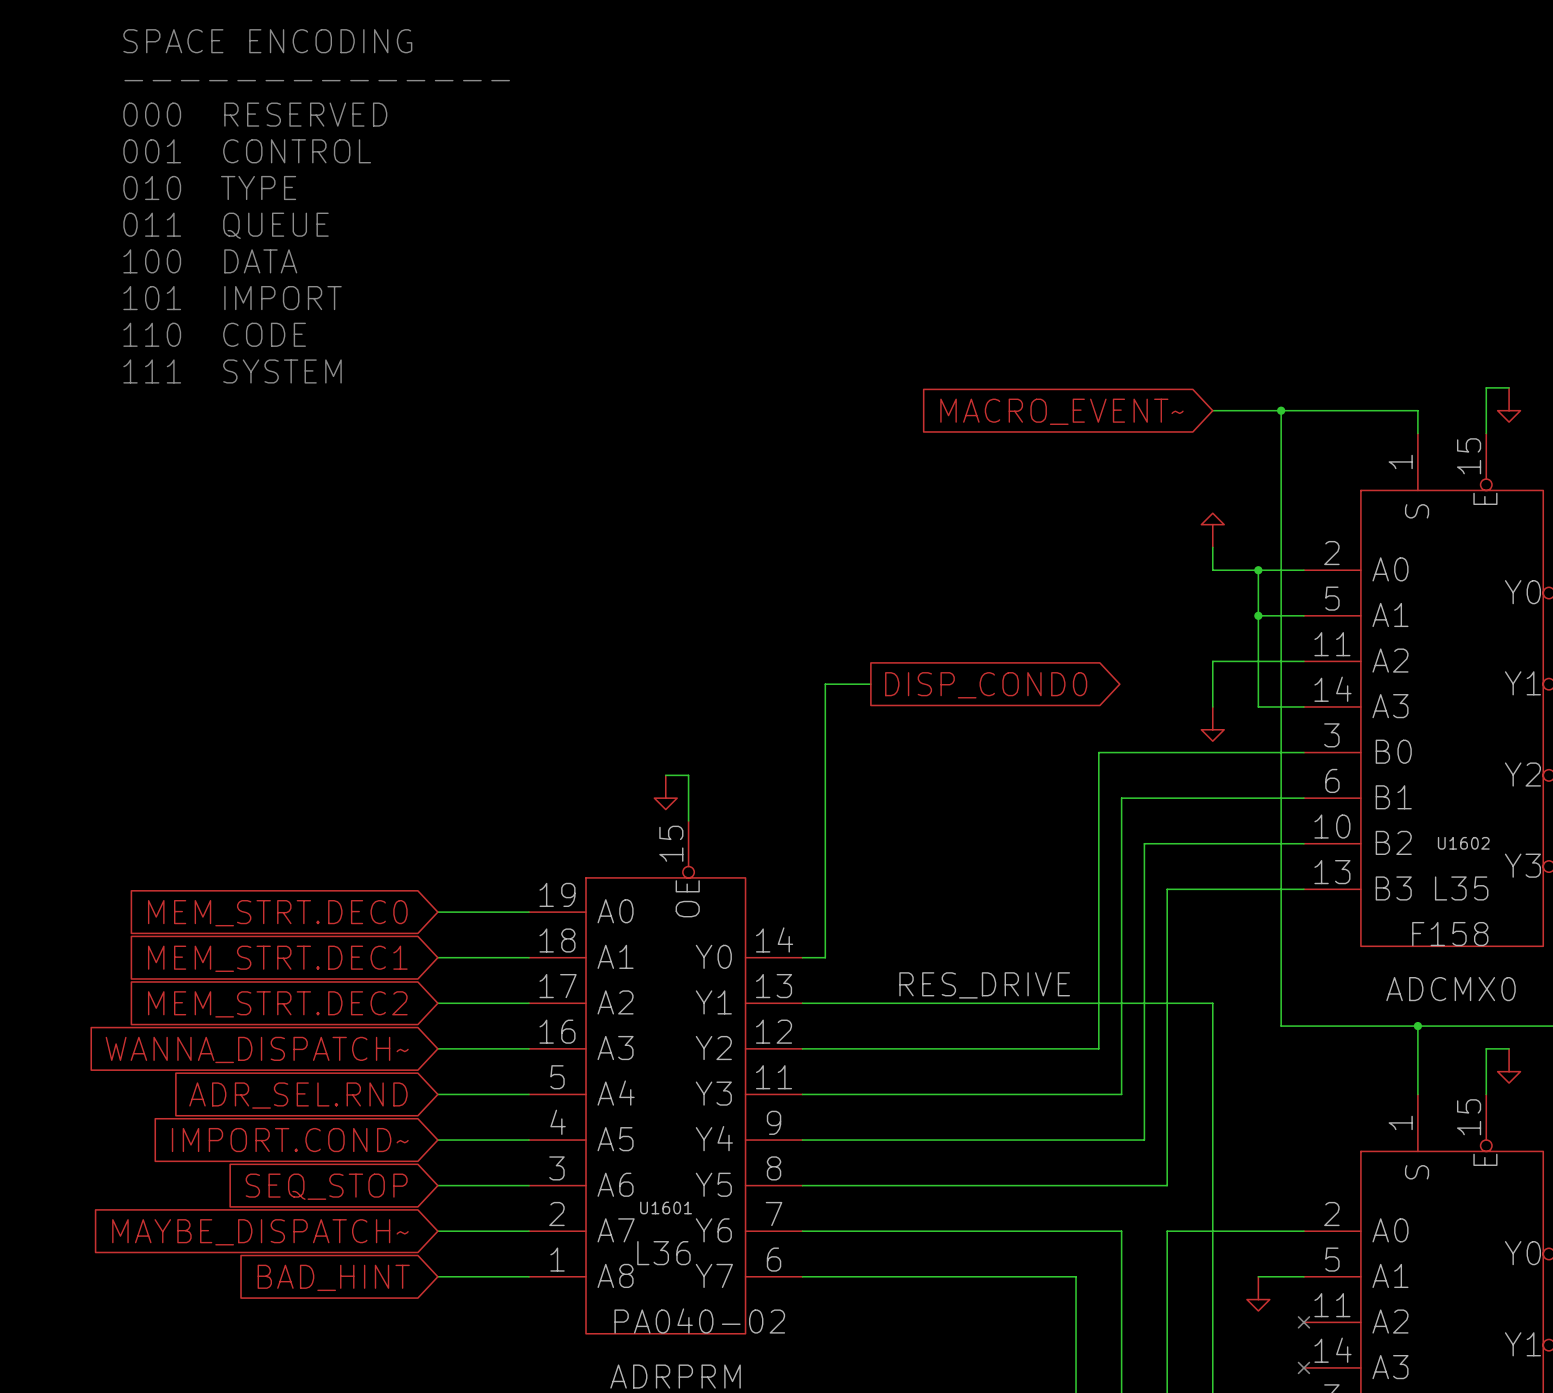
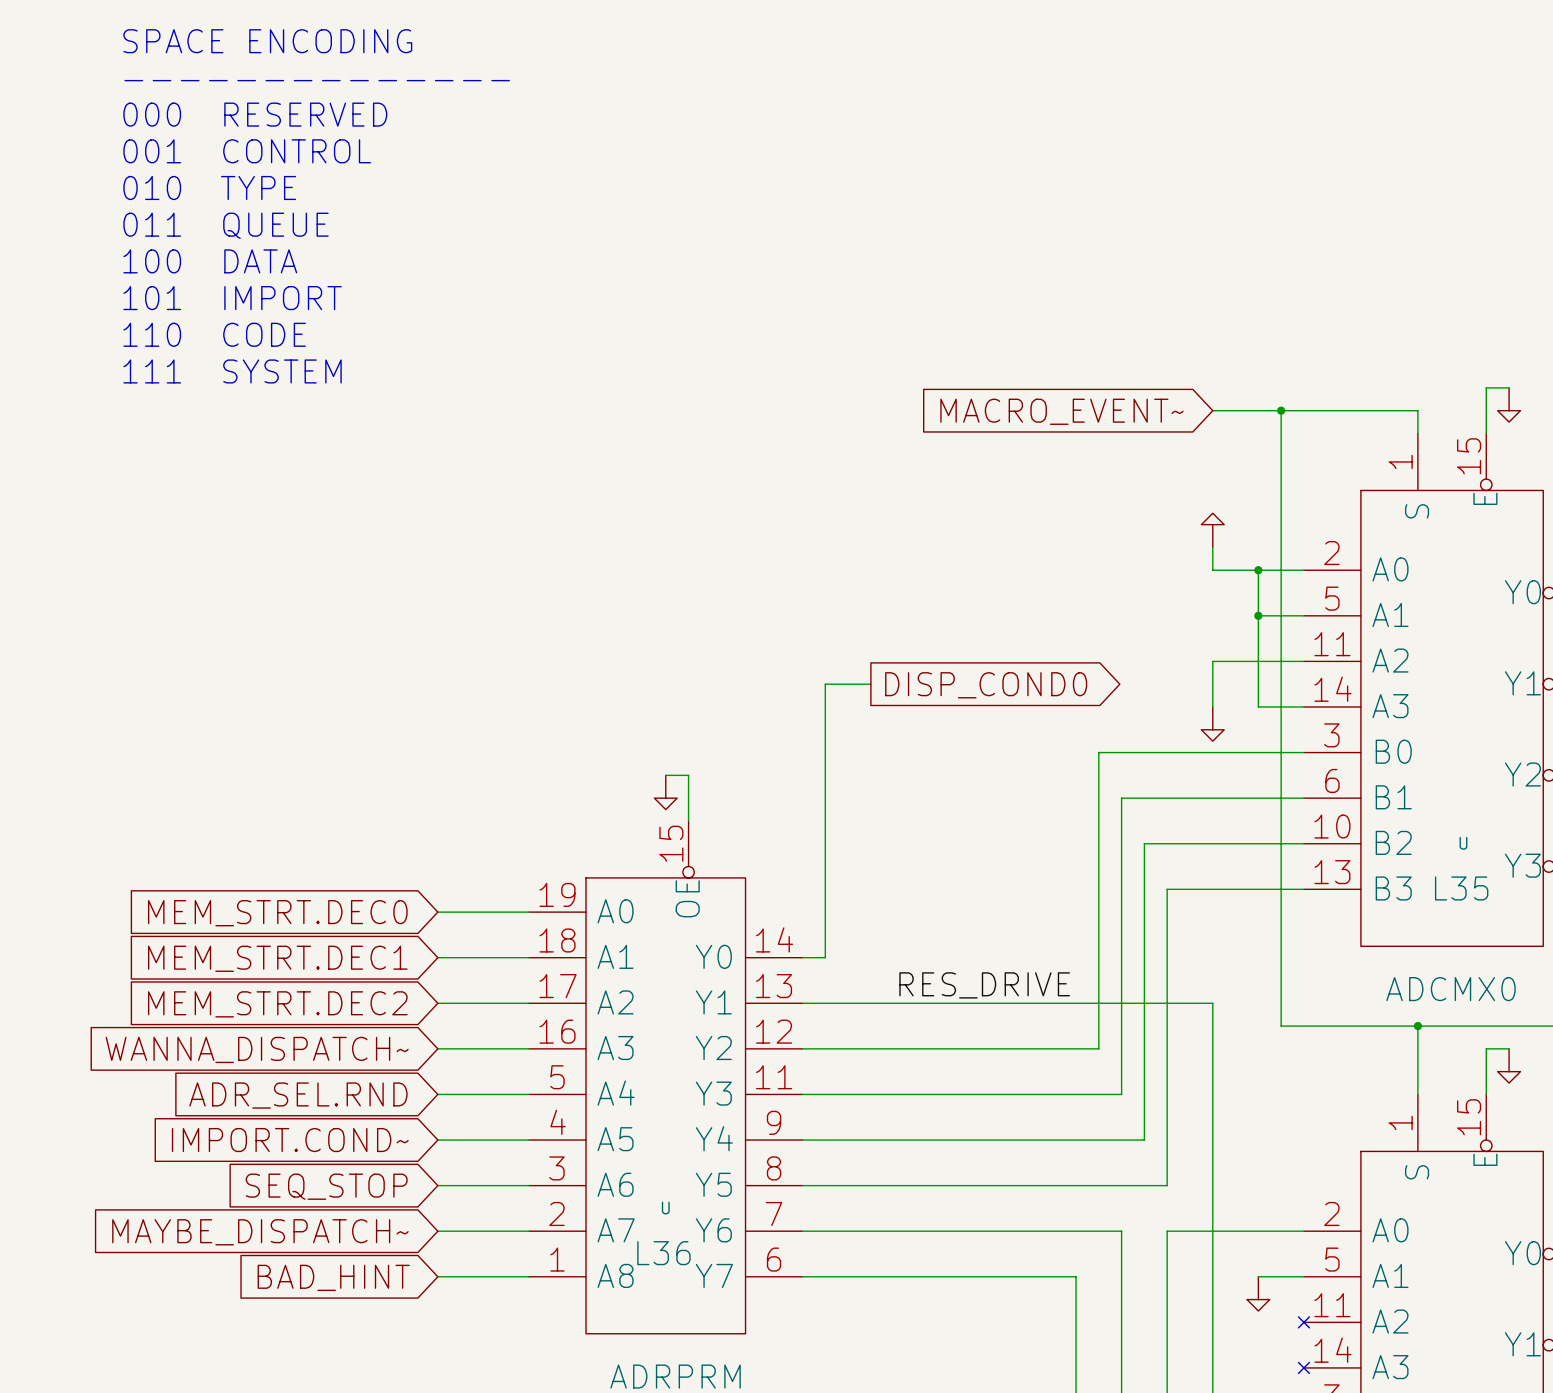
U1602 name: U1602 (1463, 843) -> U (1463, 843)
U1602 value: F158 (1450, 934) -> none
U1601 name: U1601 (666, 1207) -> U (665, 1207)
U1601 value: PA040-02 (699, 1320) -> none

